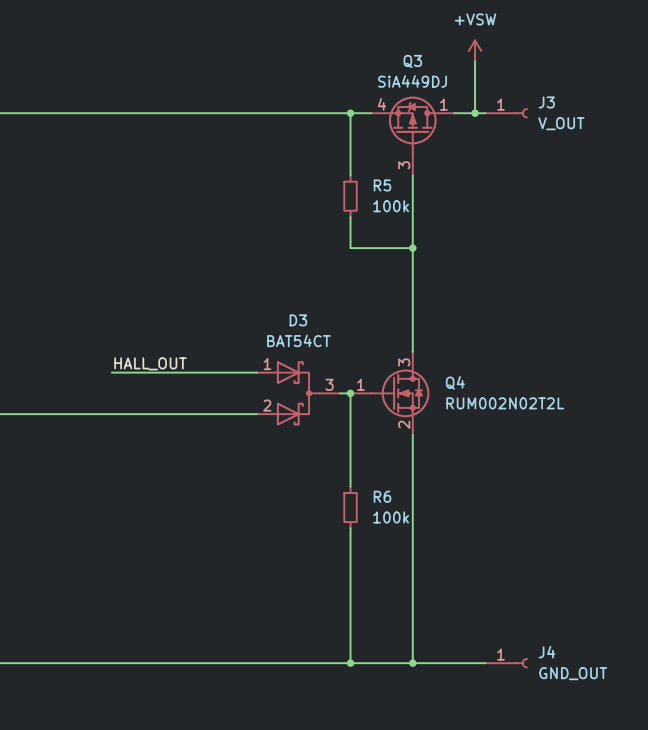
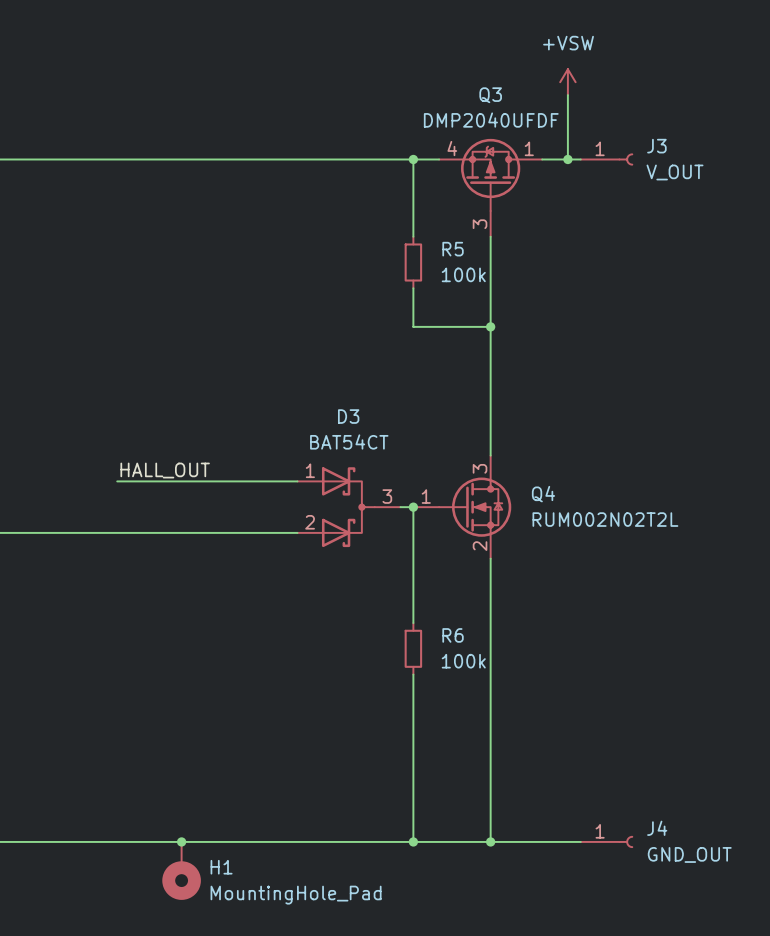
Q3 value: SiA449DJ (412, 81) -> DMP2040UFDF (491, 120)
junction: none -> (181, 841)
H1: none -> MountingHole_Pad (181, 870)

